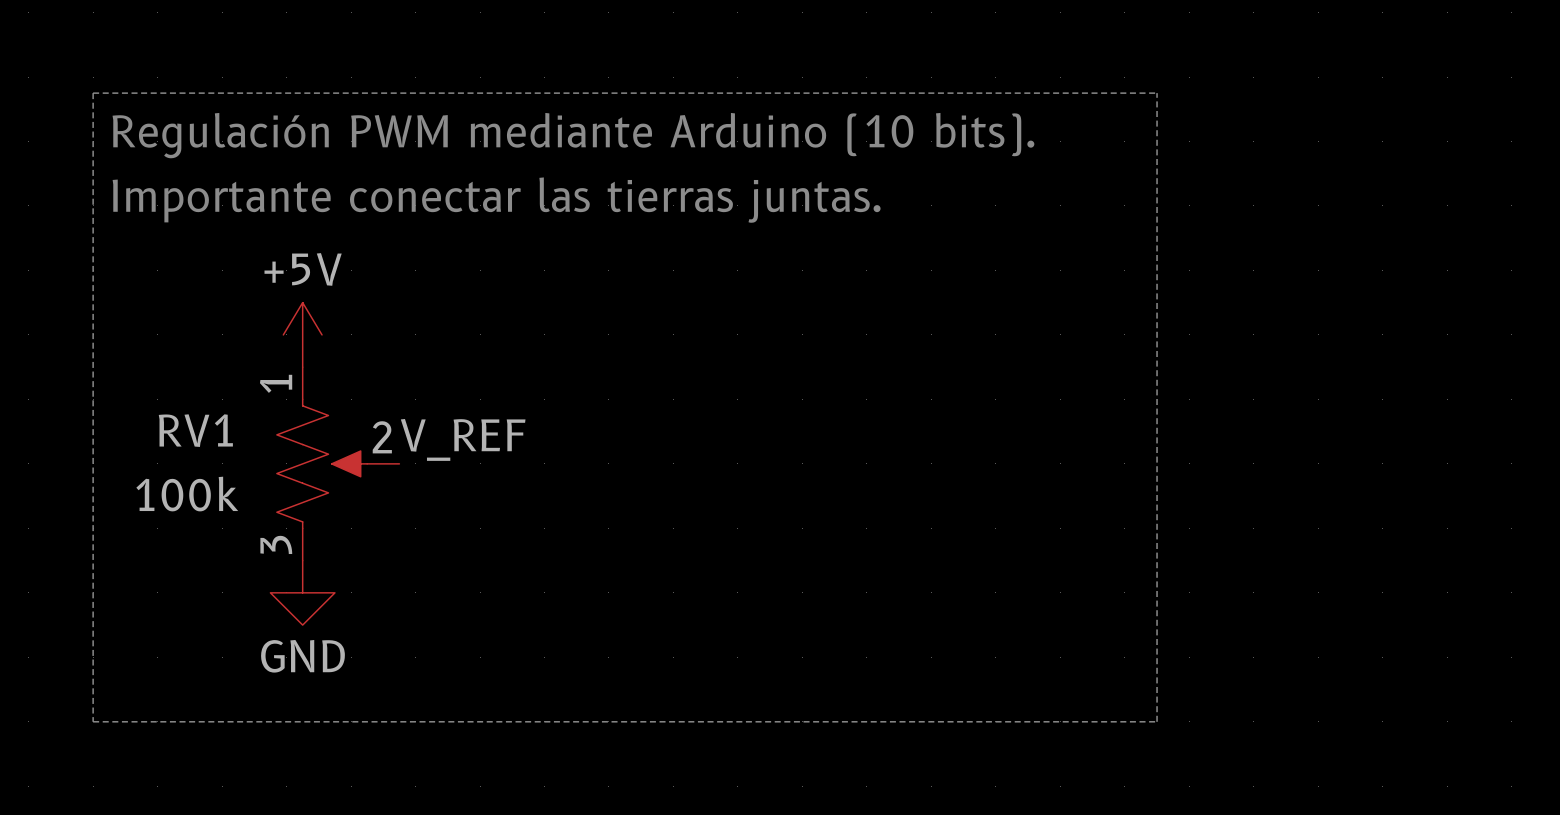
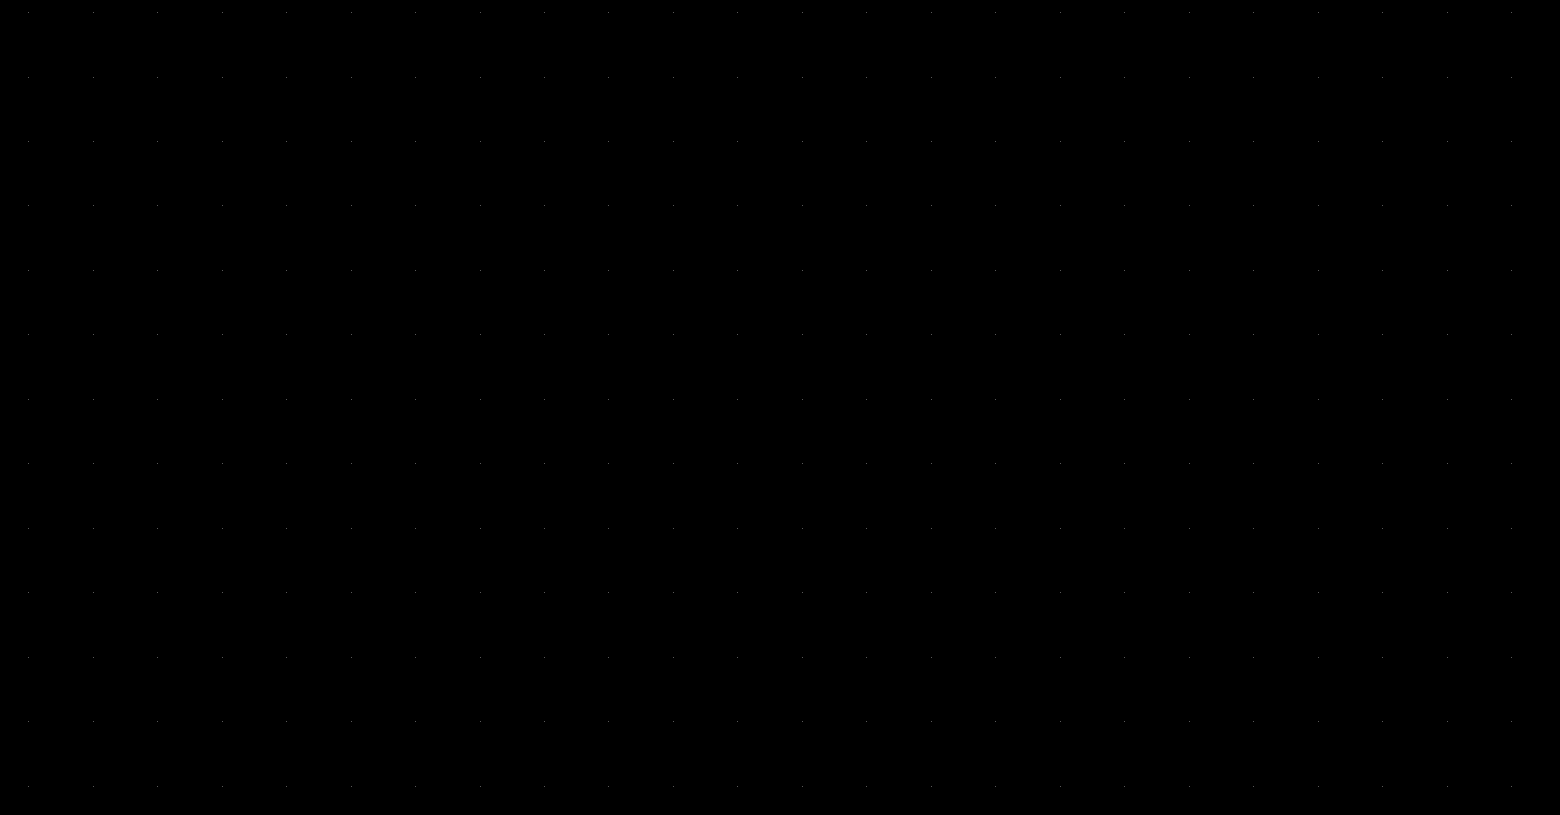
line: (93, 93) (1157, 93) (1157, 721) (93, 721) (93, 93) -> none
text: Regulación PWM mediante Arduino (10 bits). (573, 135) -> none
text: Importante conectar las tierras juntas. (496, 200) -> none
power symbol: +5V (302, 334) -> none
label: V_REF (463, 439) -> none
RV1: 100k (338, 463) -> none
power symbol: GND (302, 592) -> none

